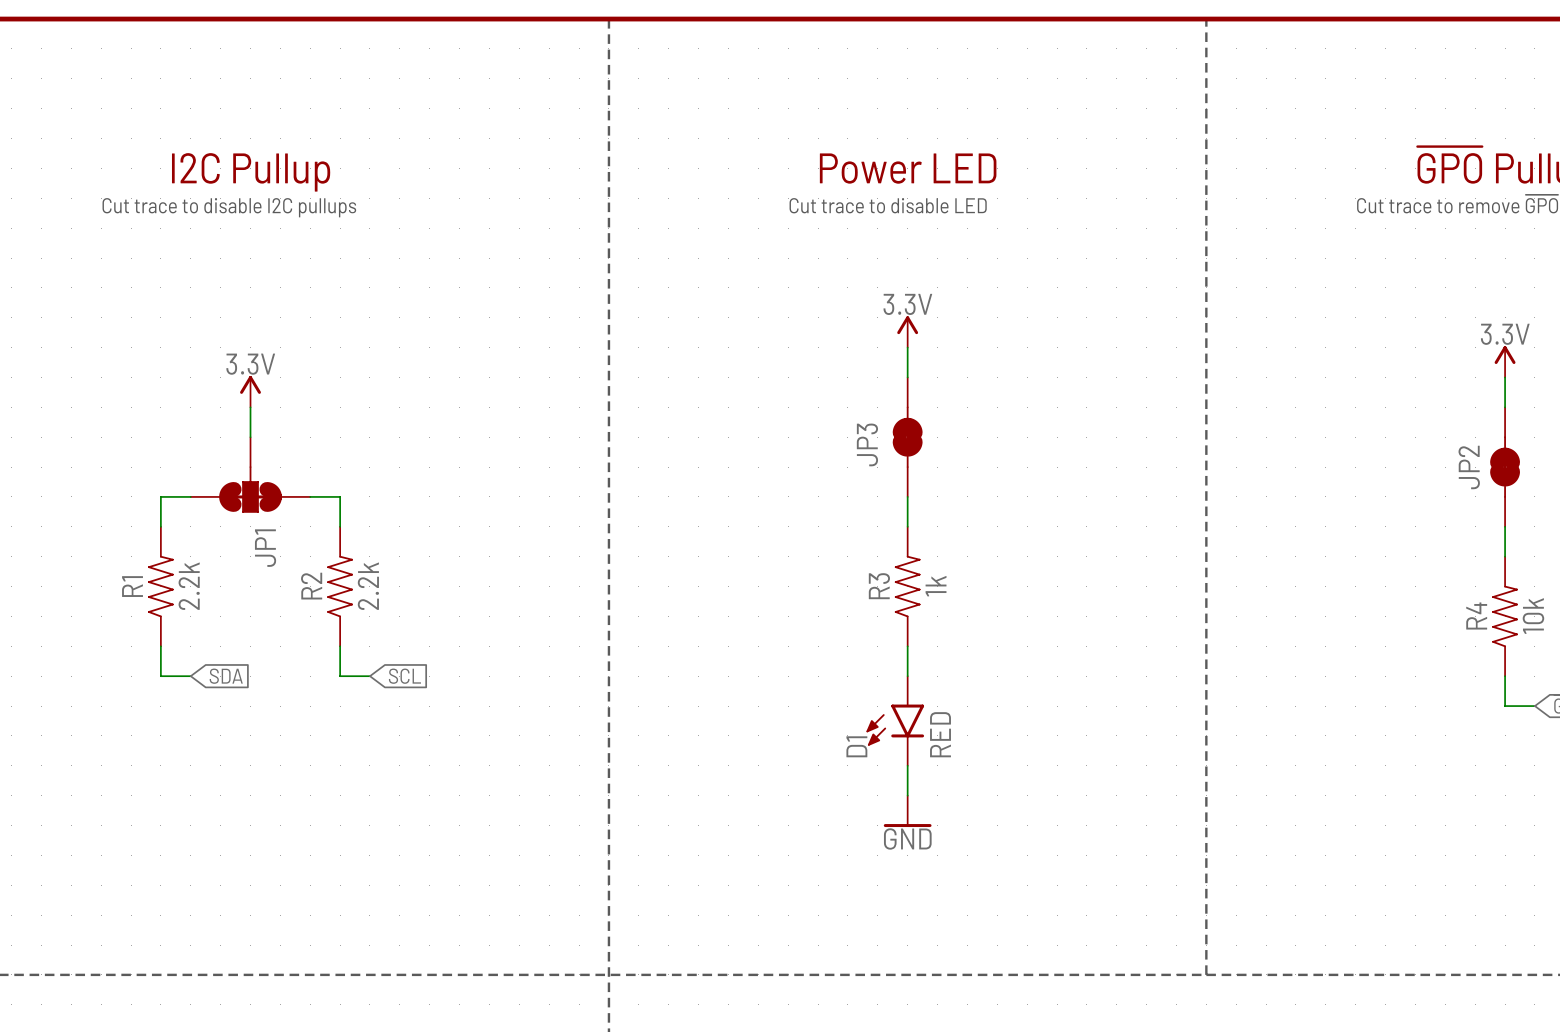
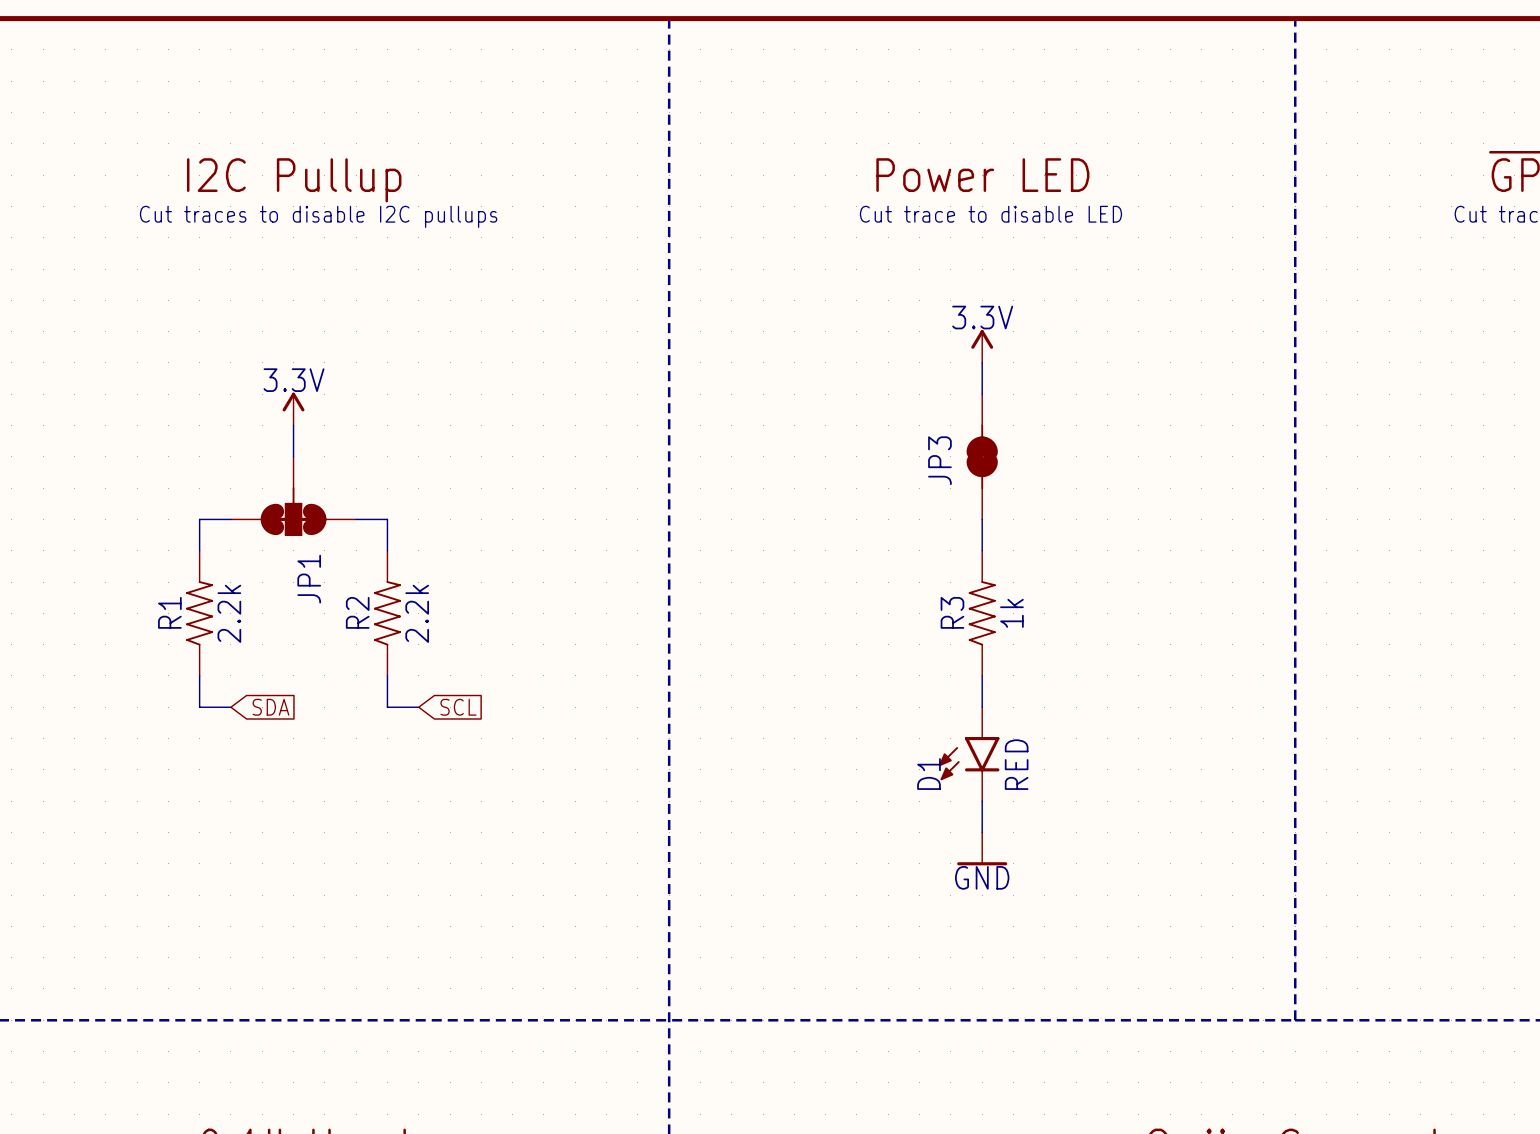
text: Cut trace to disable I2C pullups (229, 207) -> Cut traces to disable I2C pullups (318, 216)

